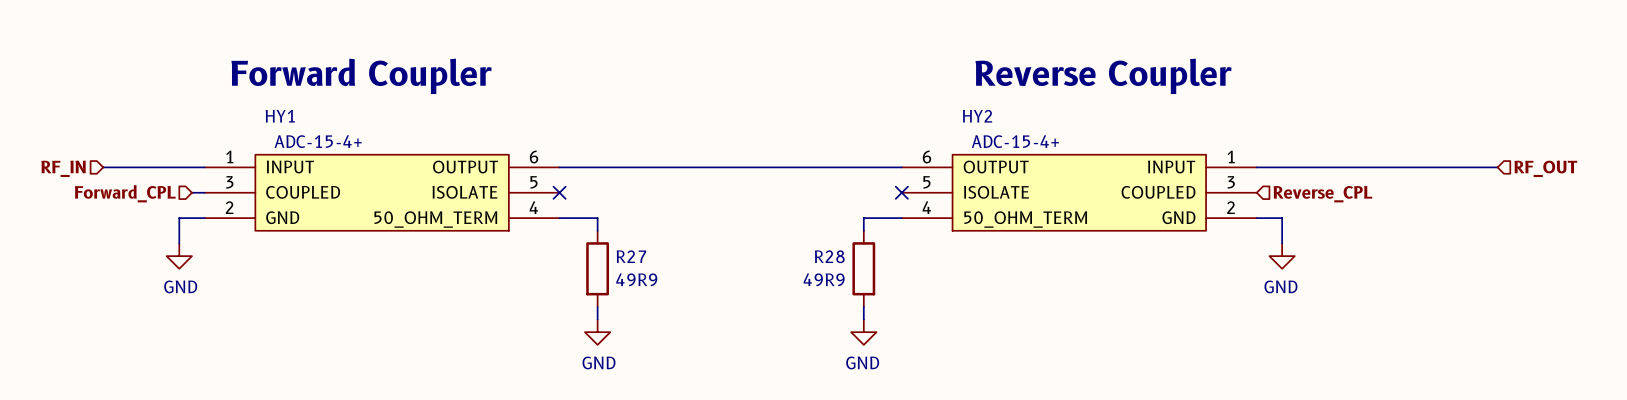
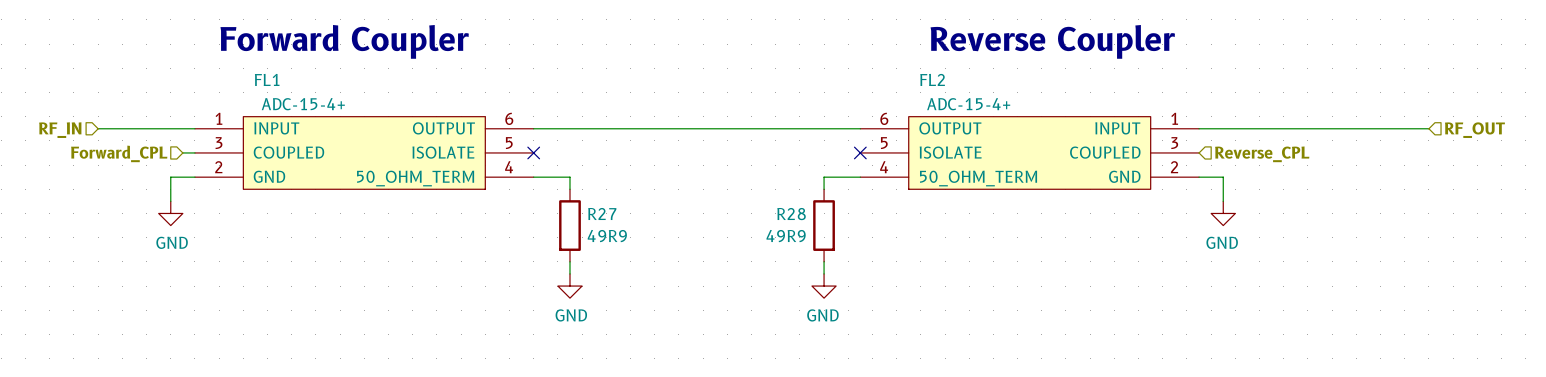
HY1 name: HY1 (280, 116) -> FL1 (267, 79)
HY2 name: HY2 (977, 116) -> FL2 (932, 79)

